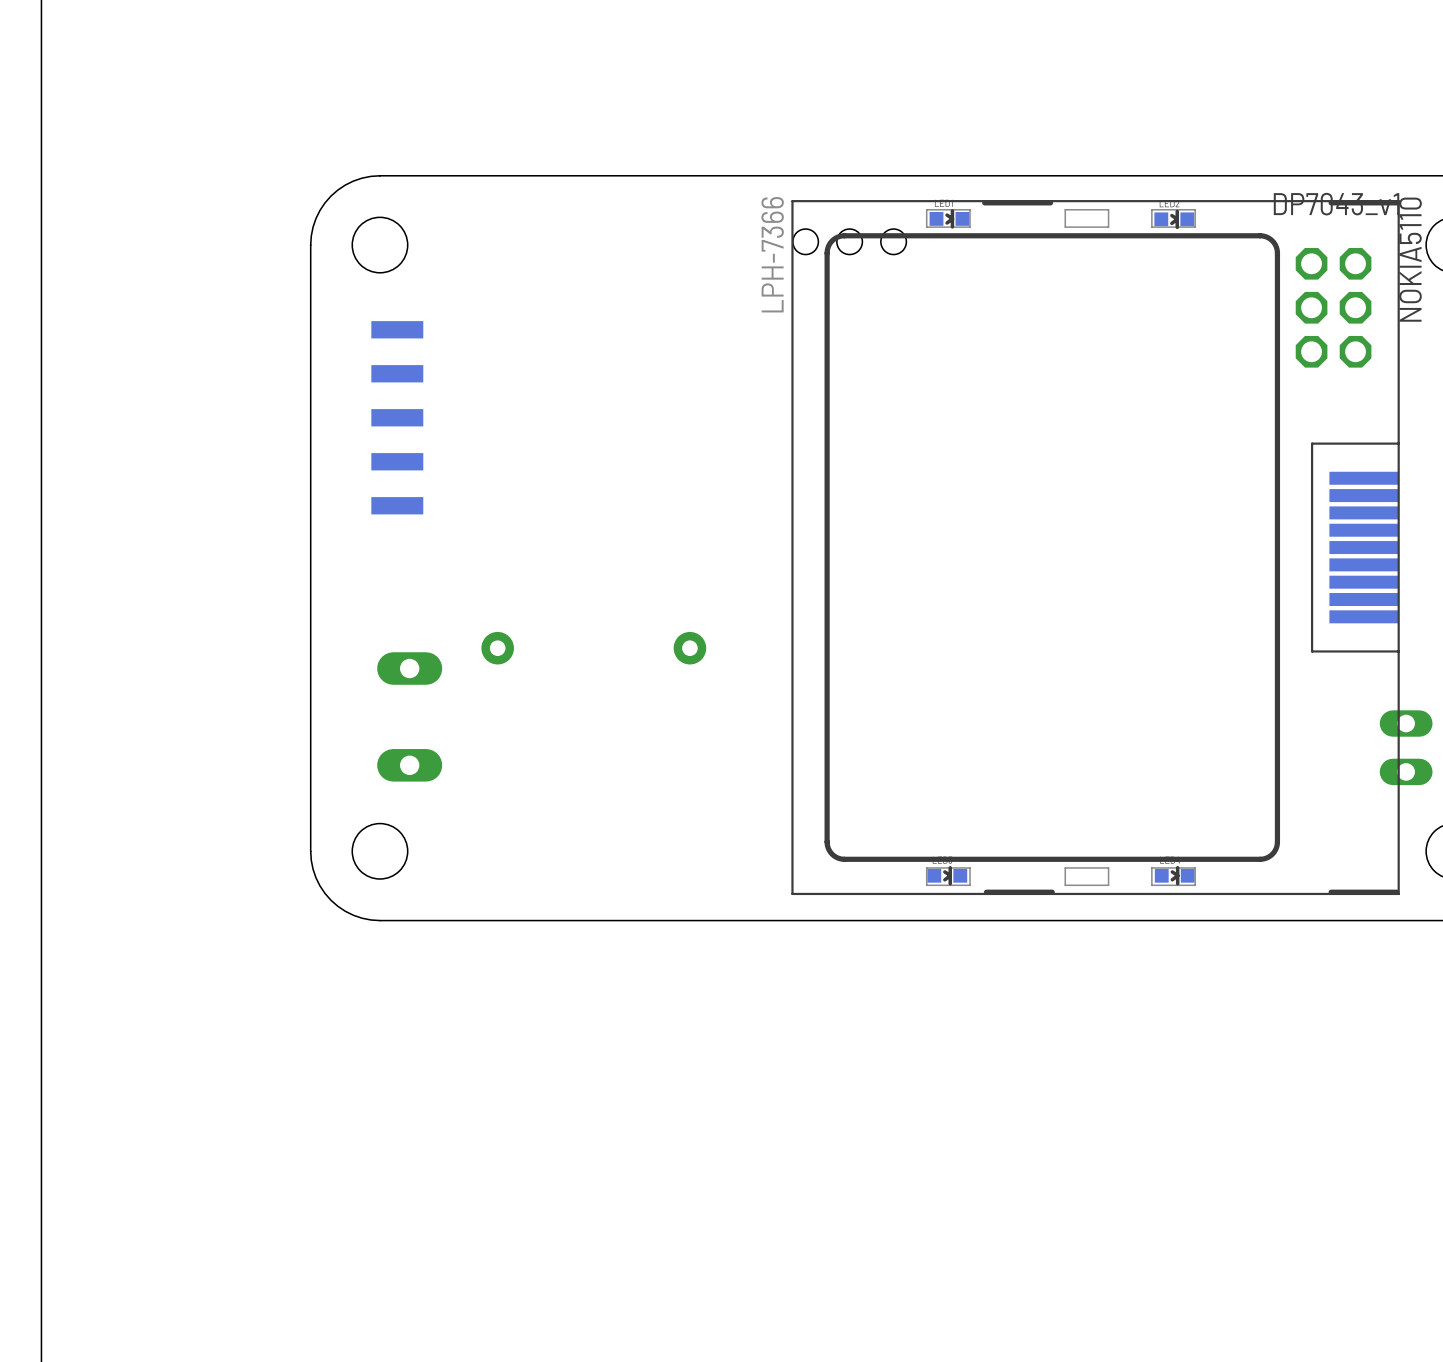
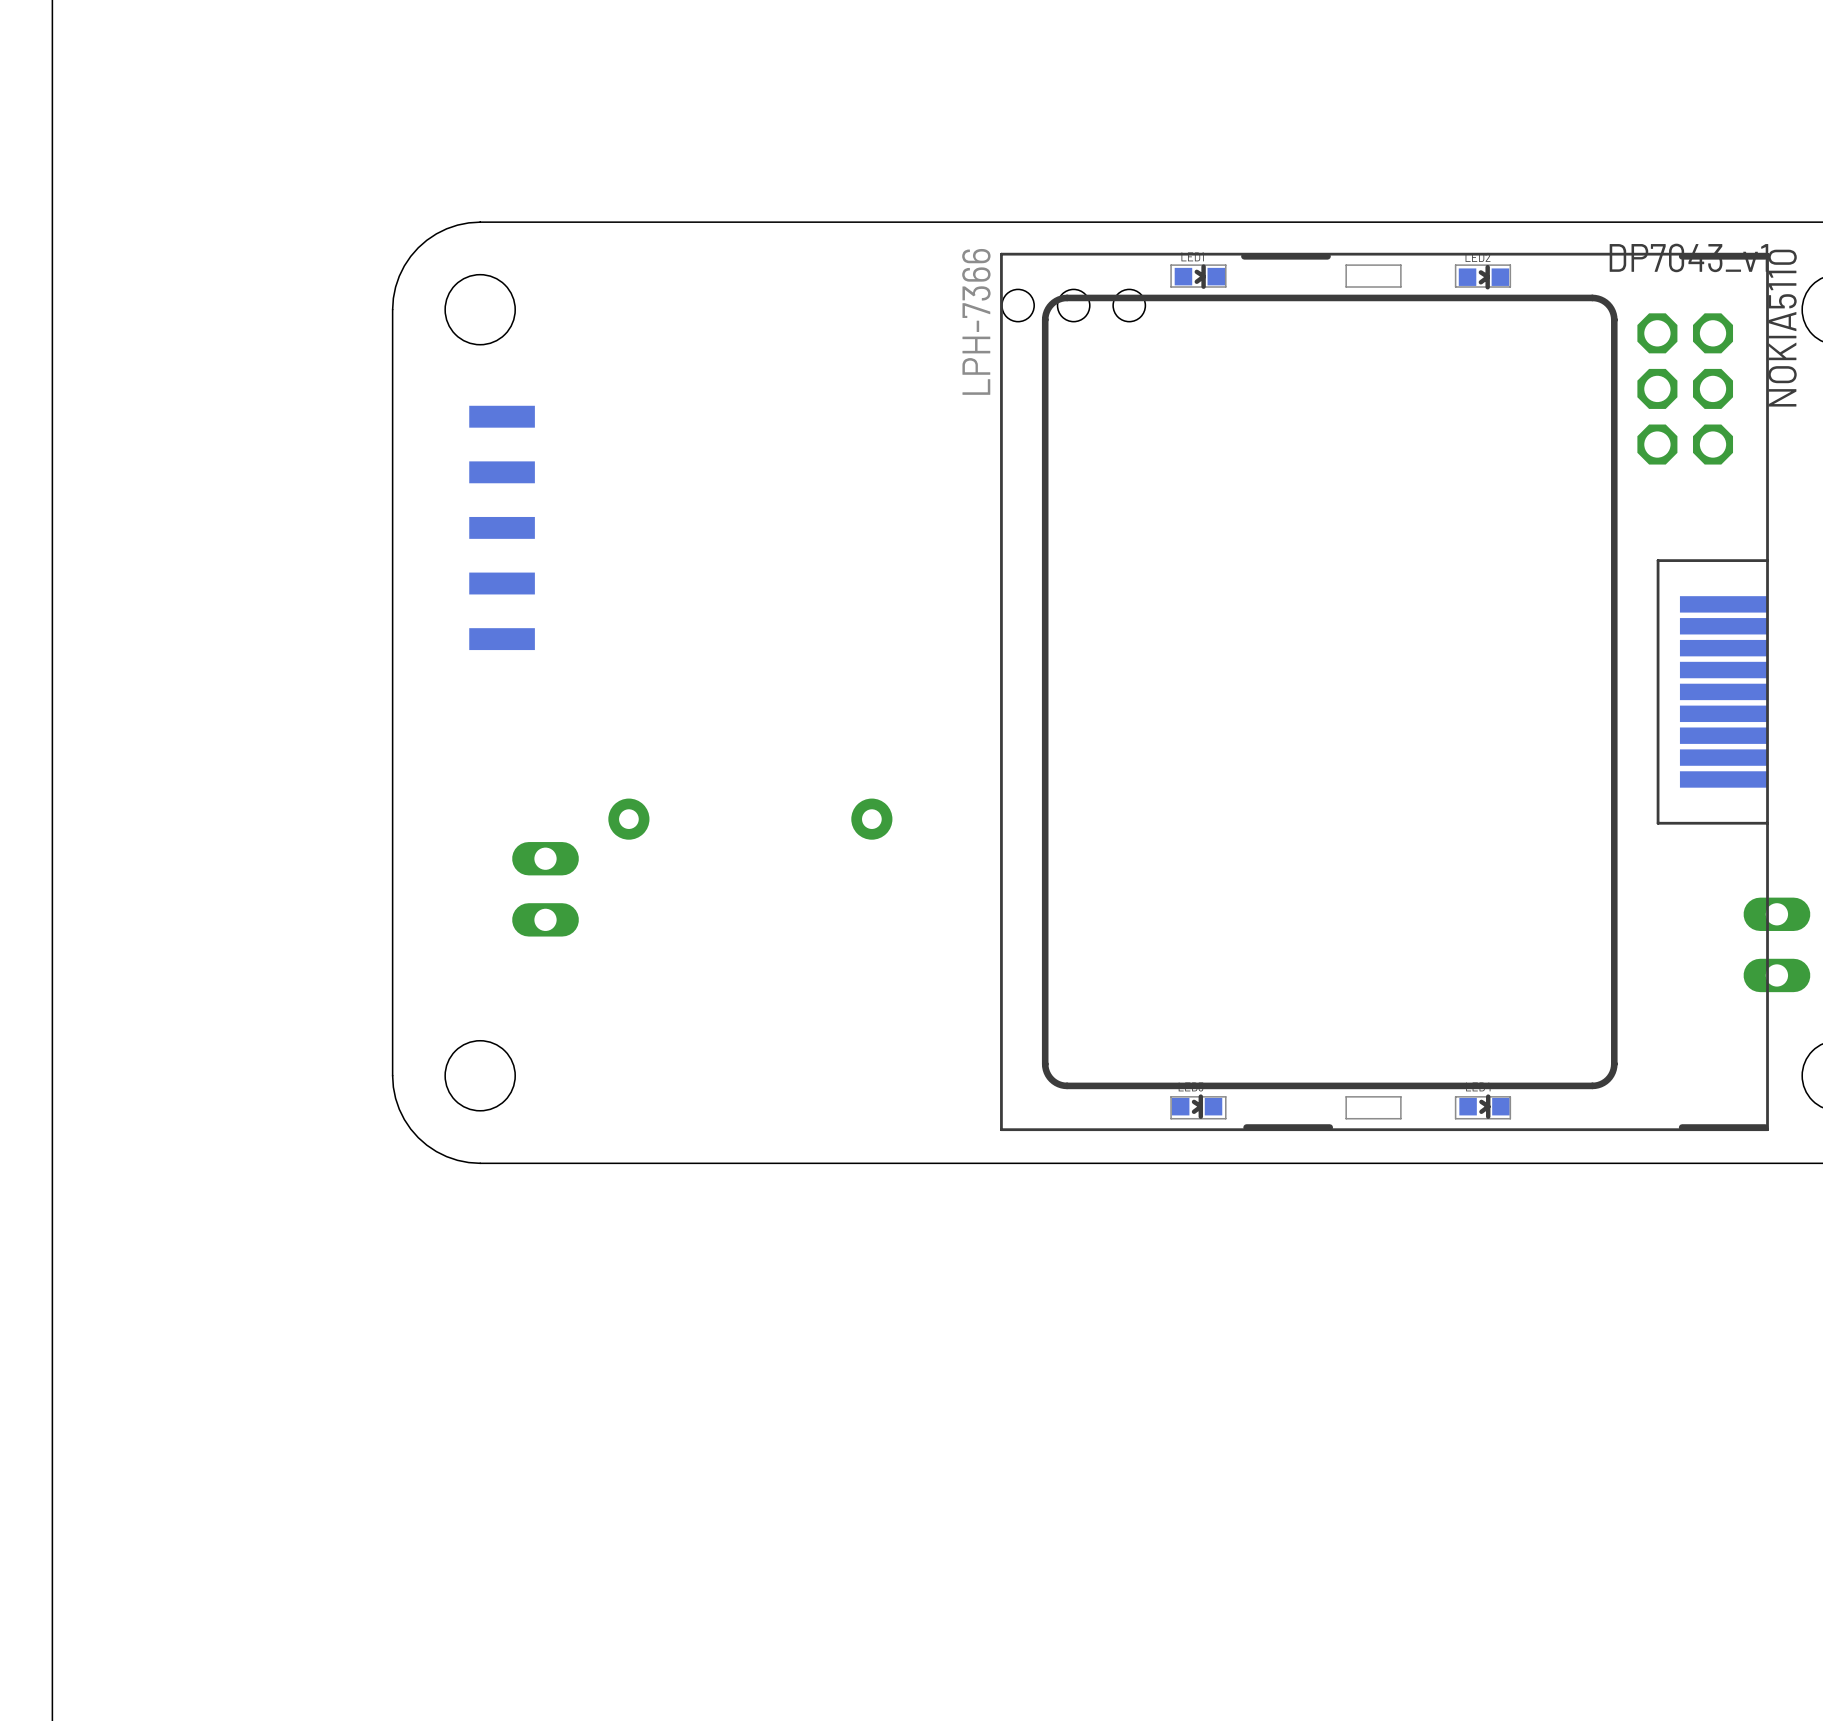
part: (409, 668) -> none
part: none -> (545, 889)
part: (409, 765) -> none

